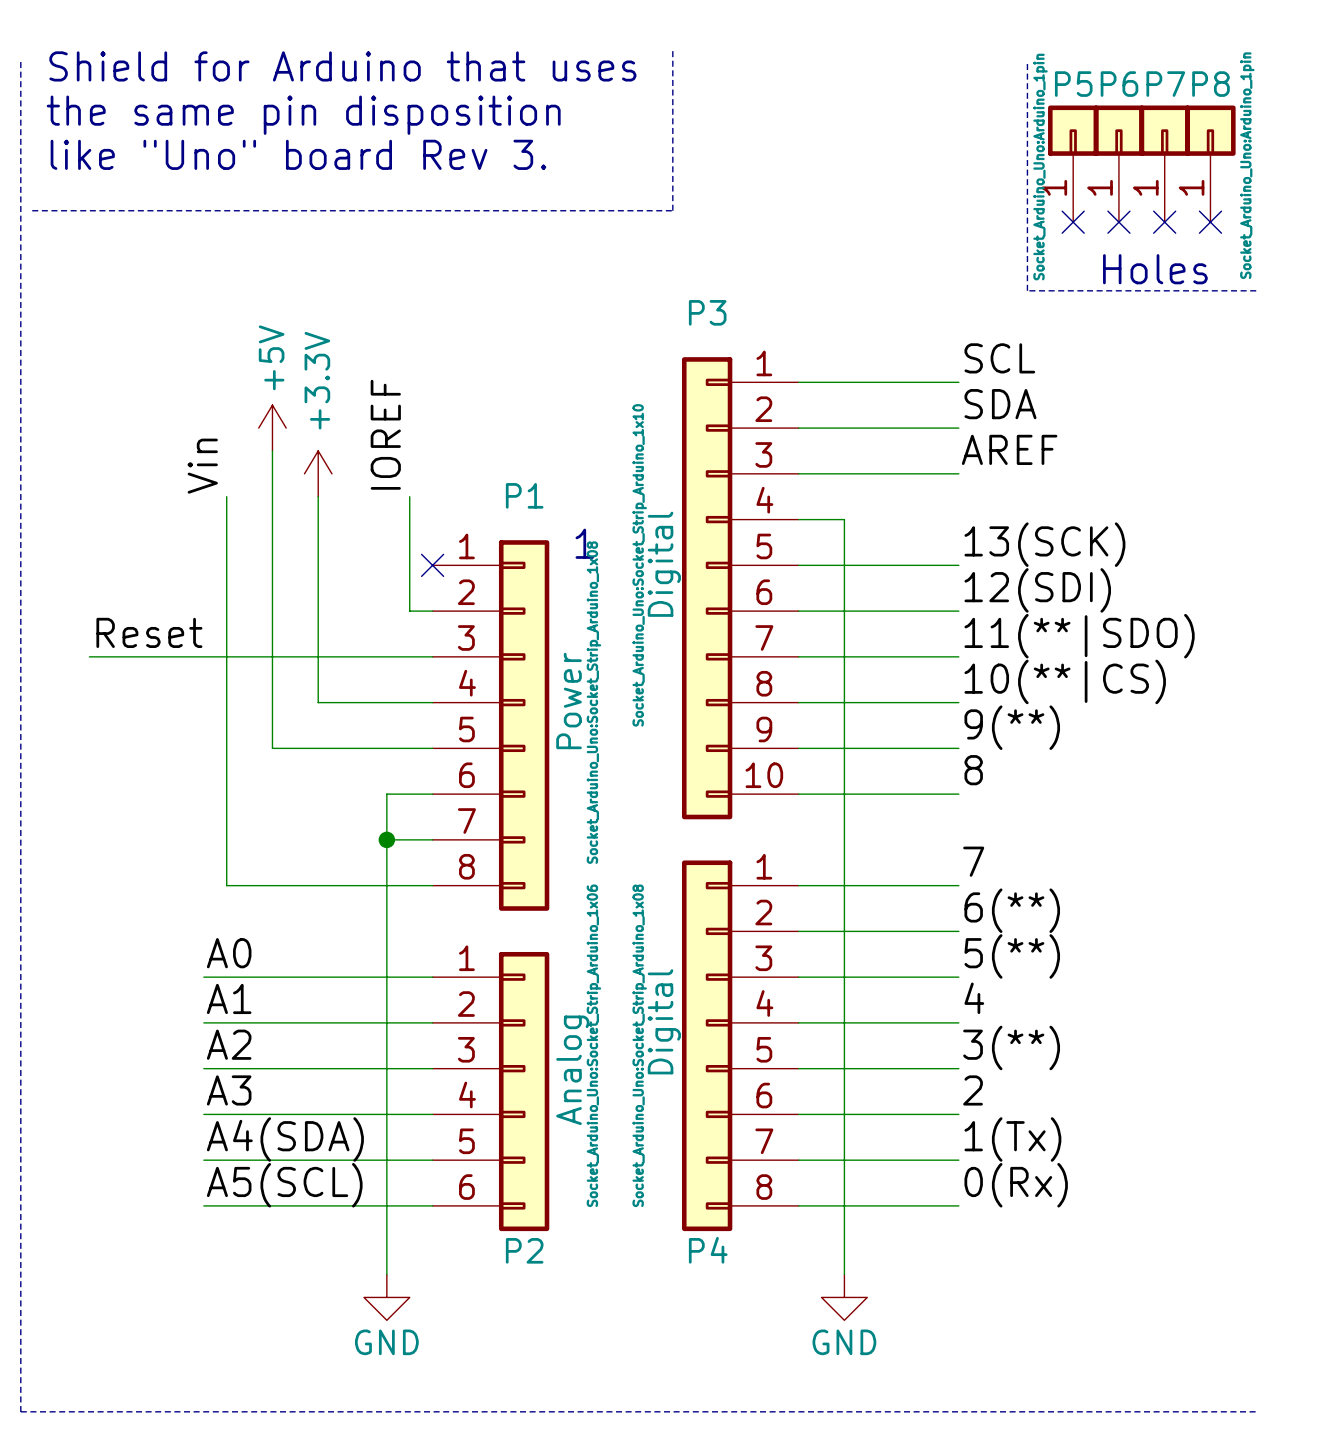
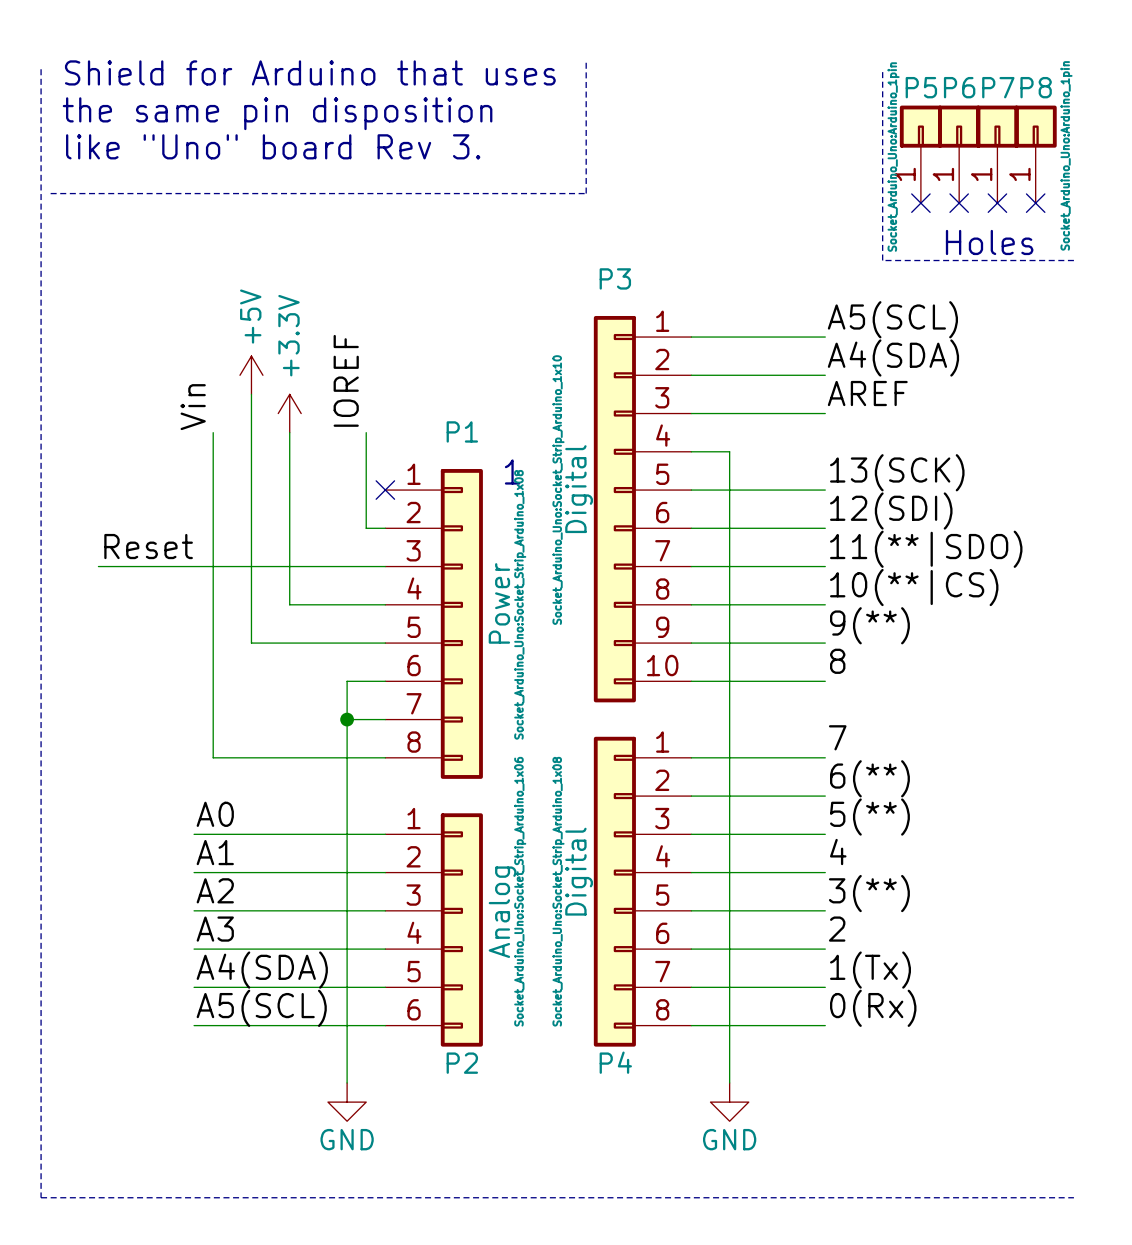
label: SCL (999, 358) -> A5(SCL) (892, 319)
label: SDA (1000, 404) -> A4(SDA) (893, 357)

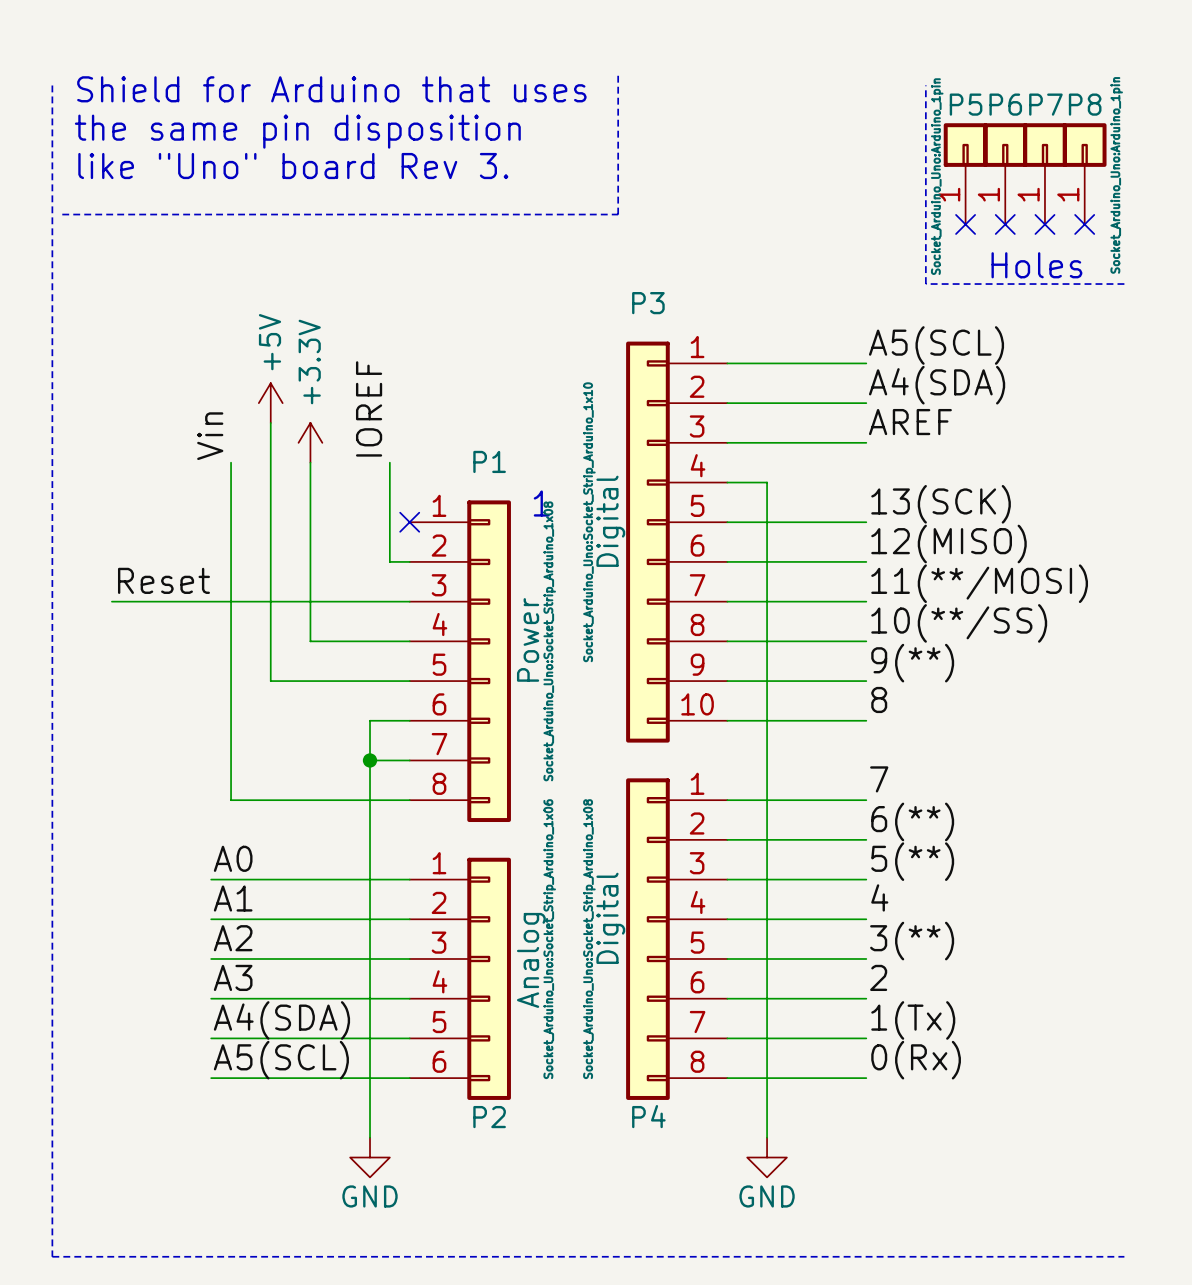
label: 12(SDI) (891, 511) -> 12(MISO) (948, 544)
label: 11(**|SDO) (926, 549) -> 11(**/MOSI) (979, 583)
label: 10(**|CS) (914, 587) -> 10(**/SS) (959, 623)

